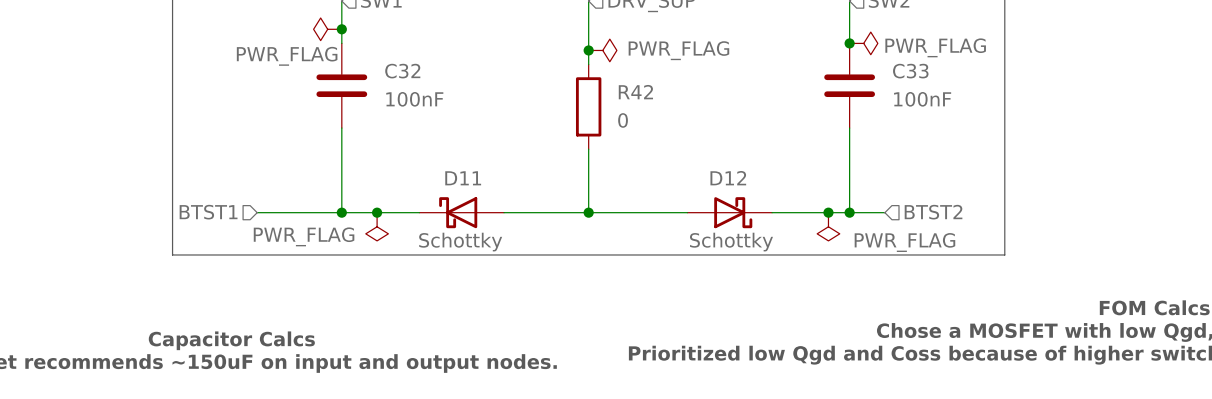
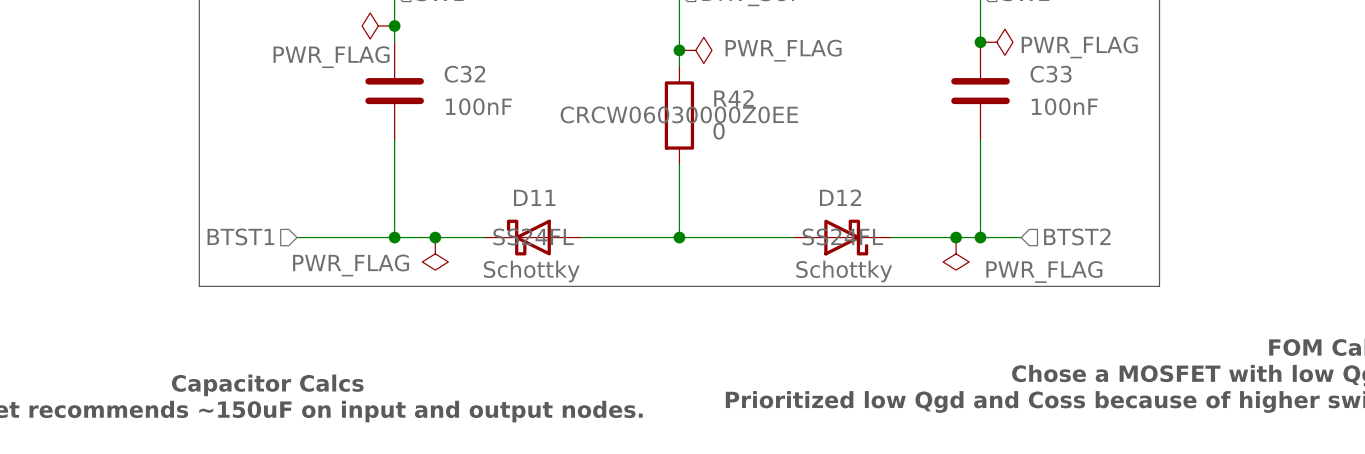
R42 text: none -> CRCW06030000Z0EE (679, 114)
D11 text: none -> SS24FL (533, 236)
D12 text: none -> SS24FL (842, 236)

